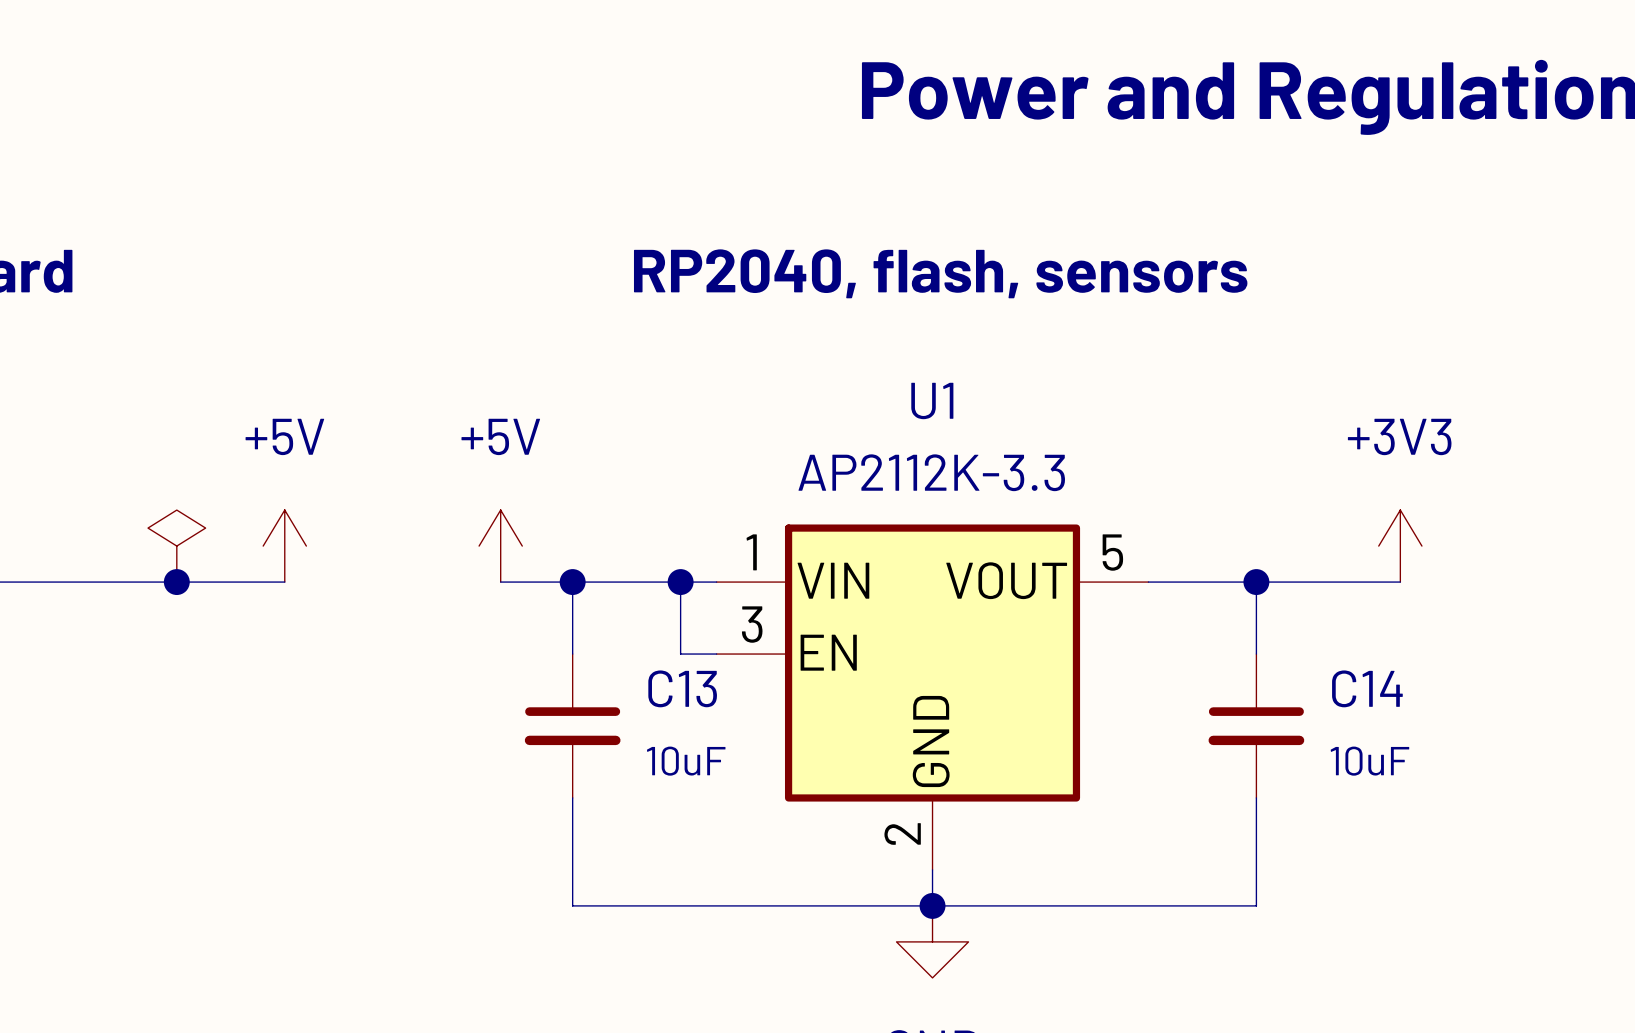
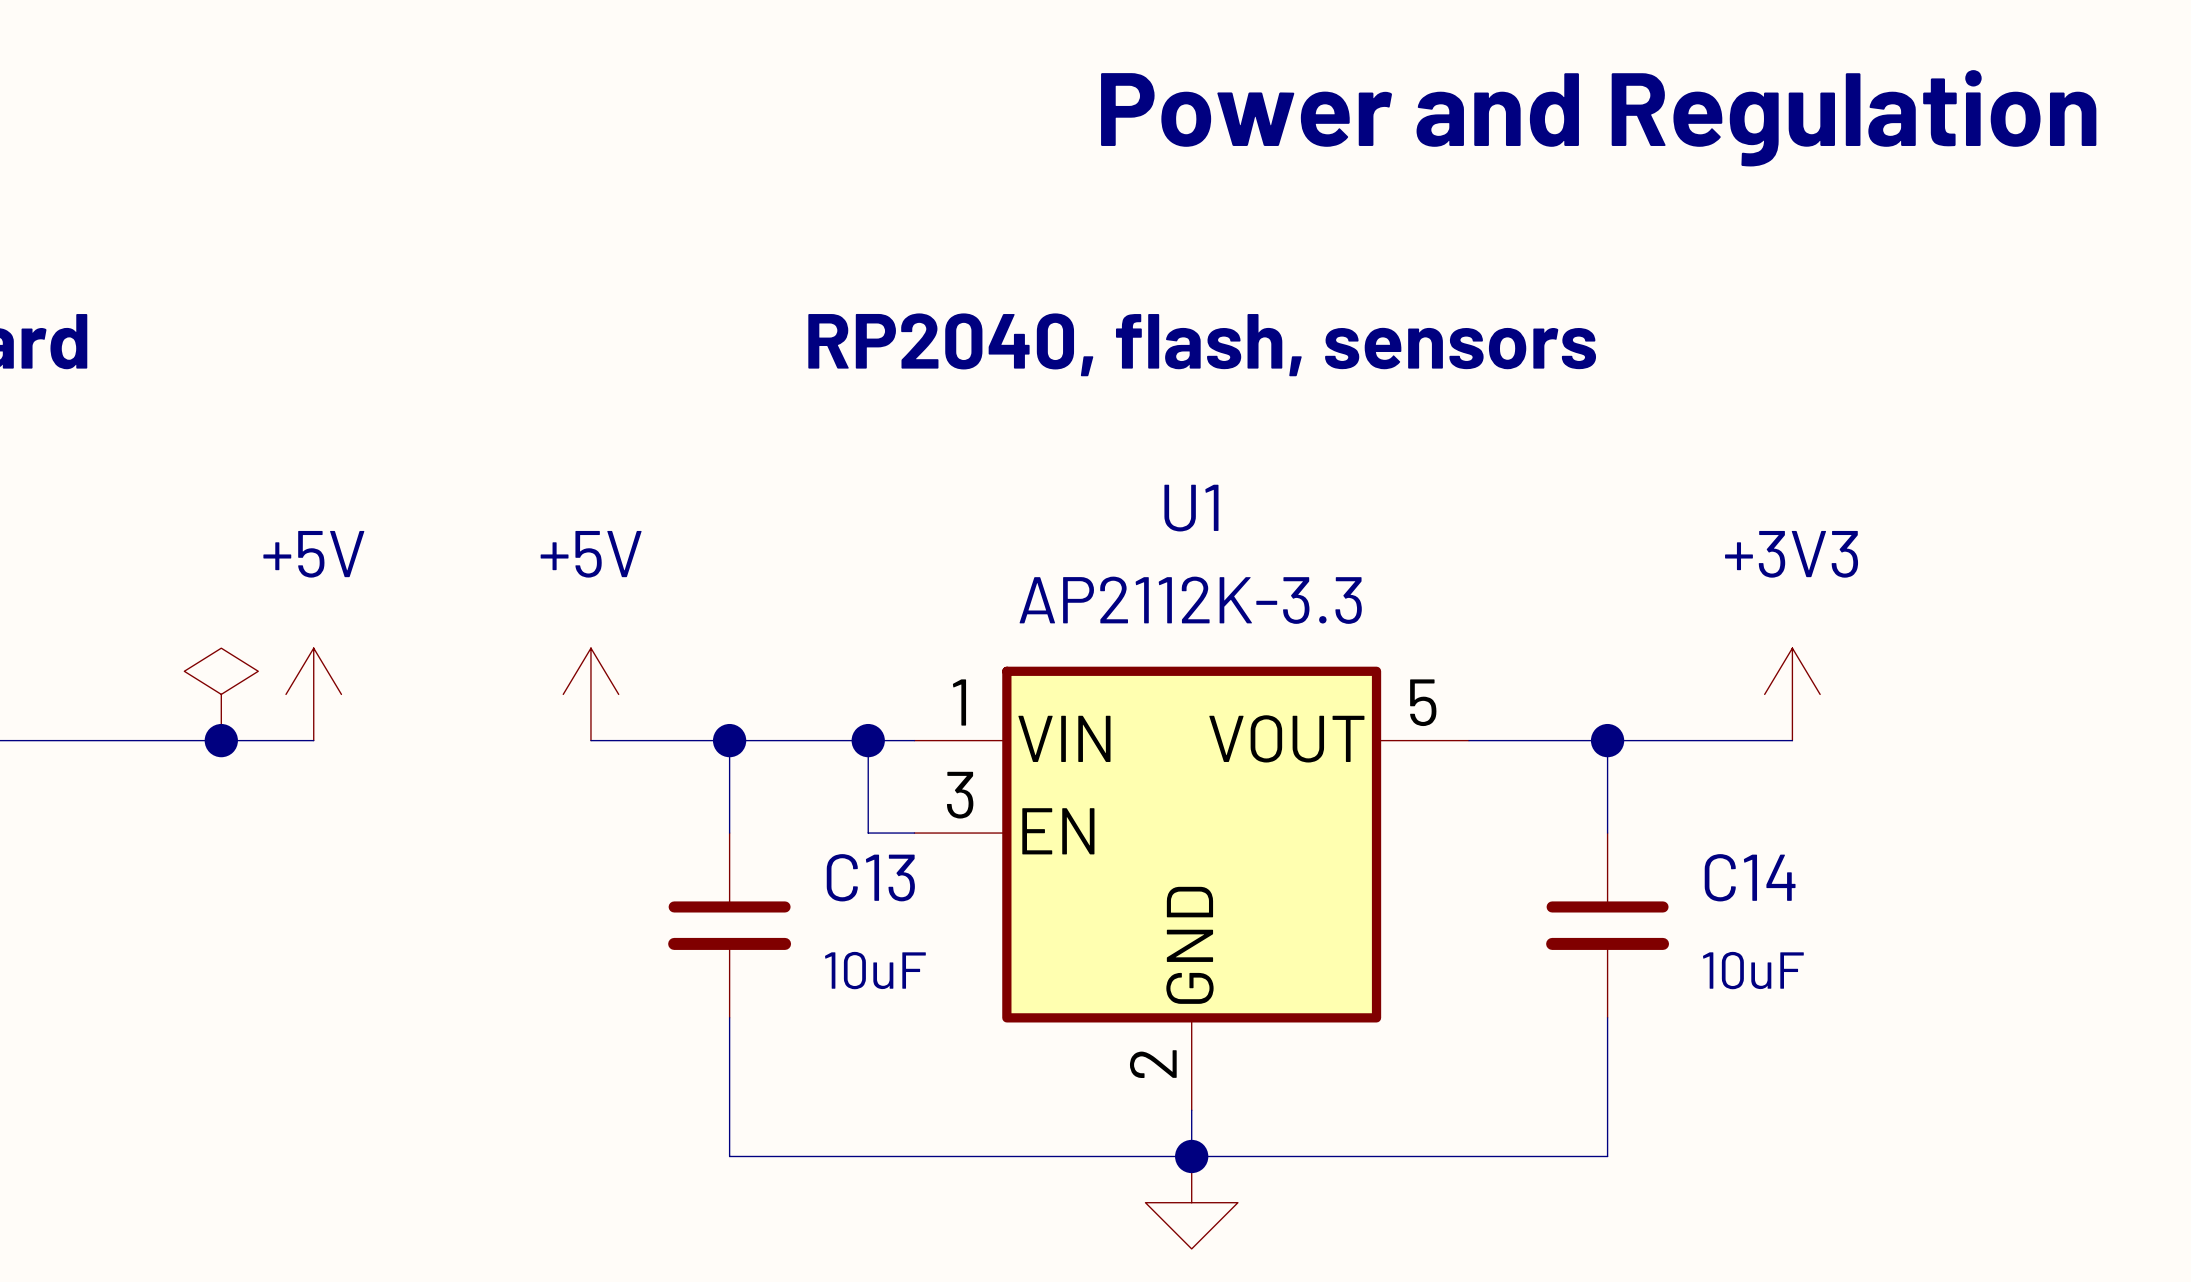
power symbol position: +5V (284, 546) -> +5V (313, 694)
power symbol position: +5V (500, 546) -> +5V (590, 694)
wire: (248, 582) (284, 582) -> (590, 740) (637, 740)

